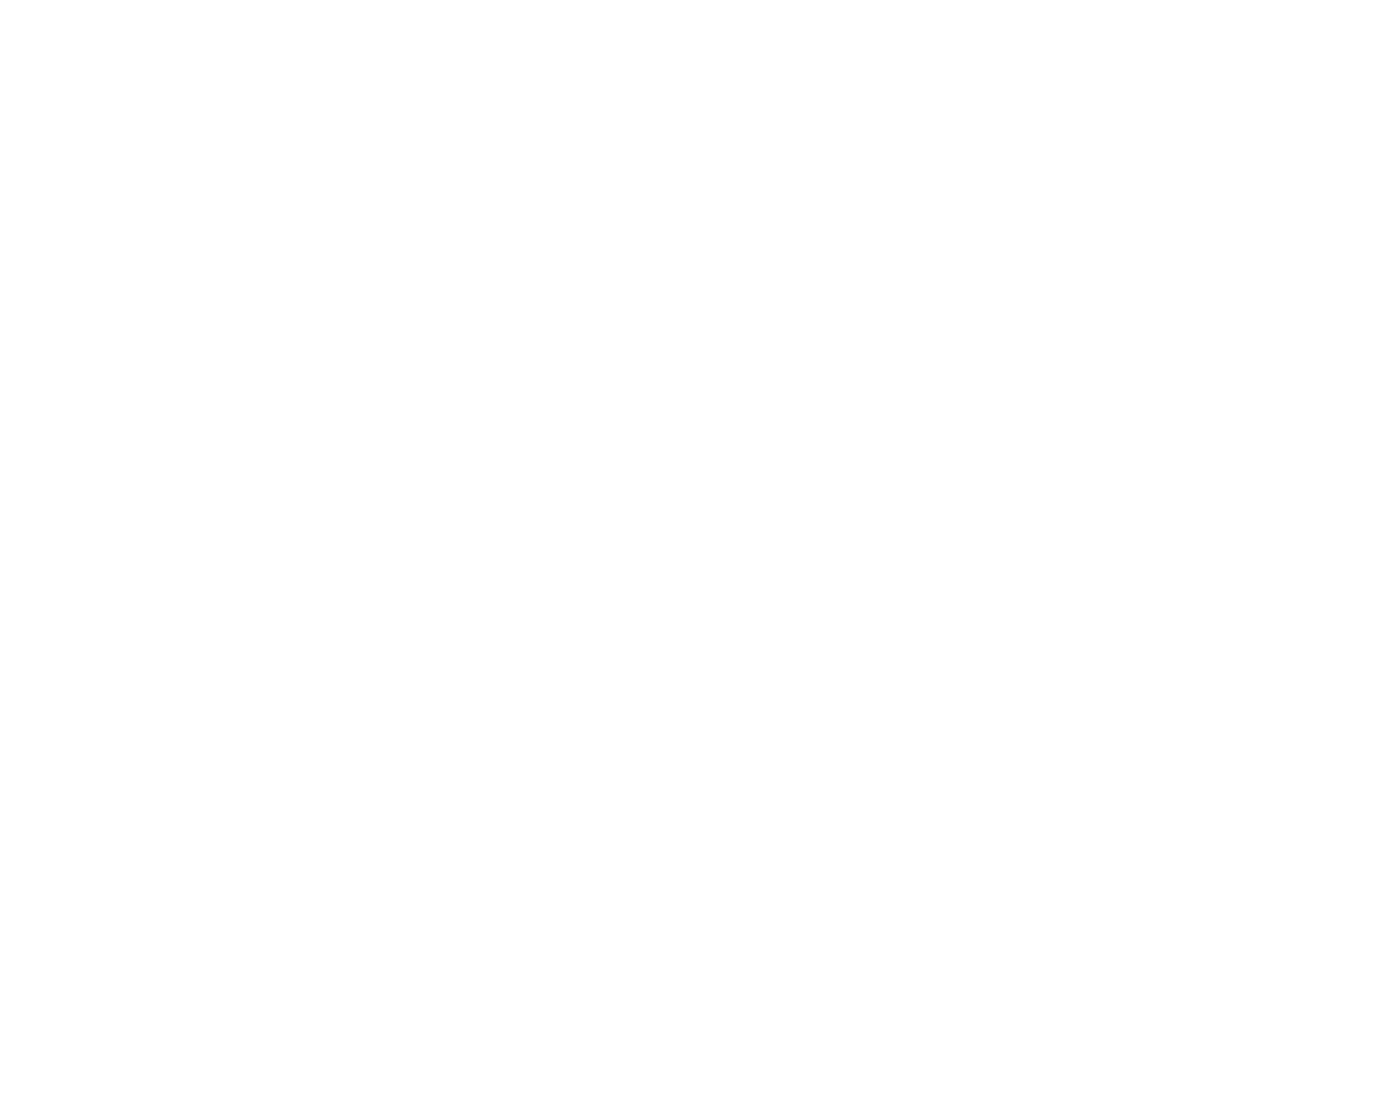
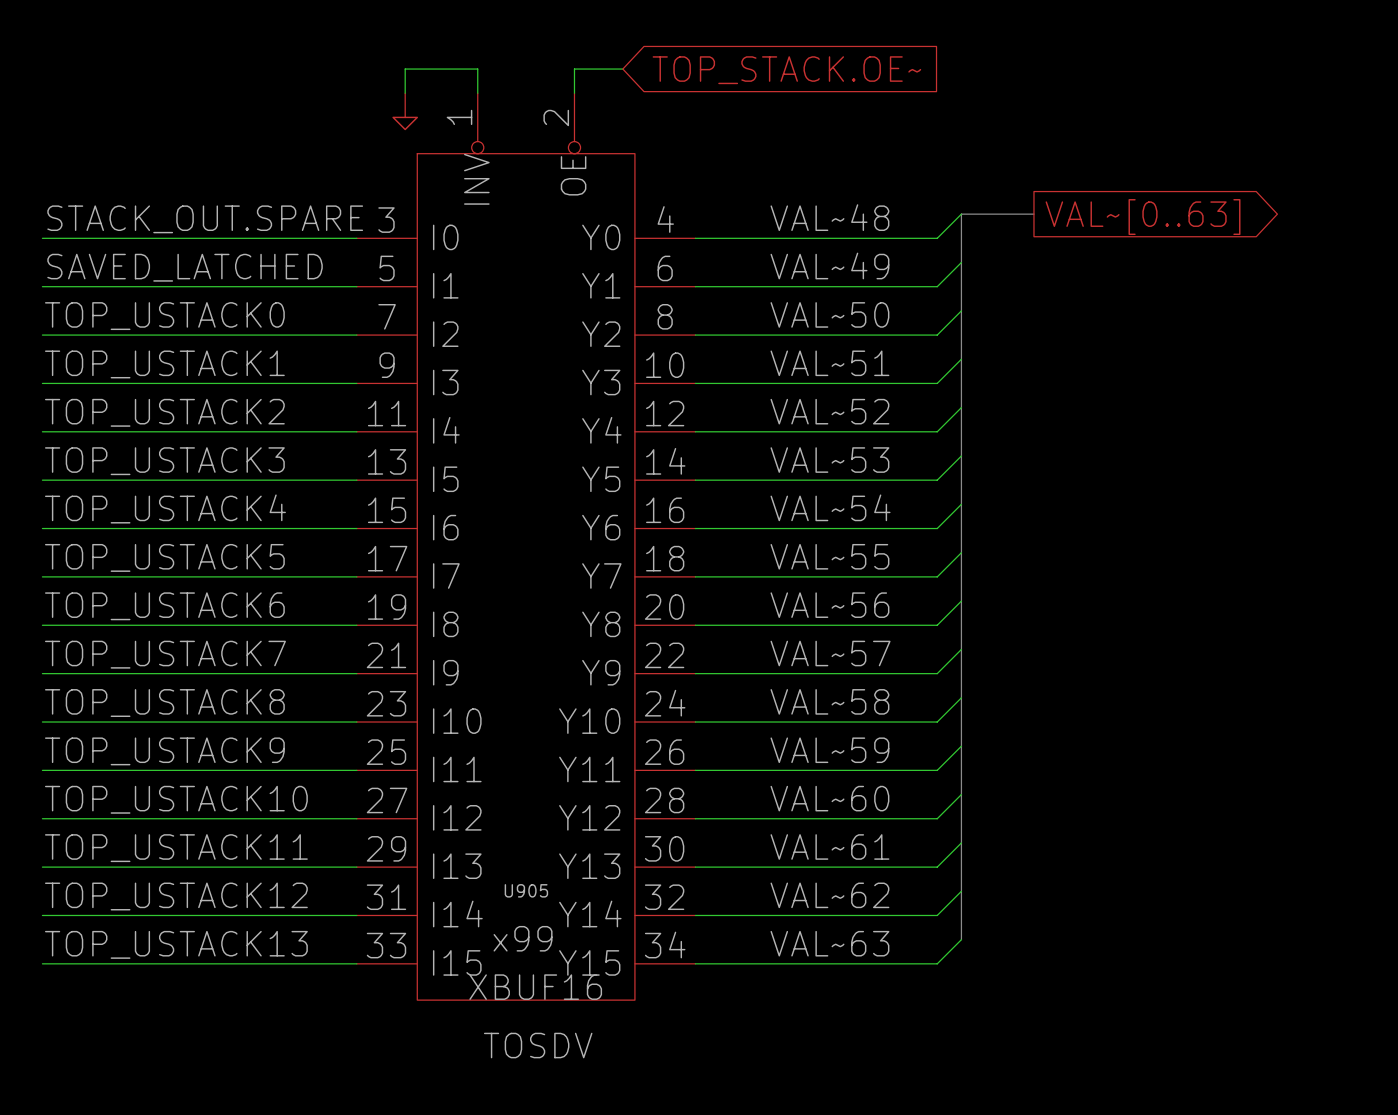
wire: none -> (622, 69) (574, 69) (574, 93)
global label: none -> TOP_STACK.OE~ (786, 70)
wire: none -> (405, 93) (405, 69) (477, 69) (477, 93)
power symbol: none -> (405, 111)
wire: none -> (961, 214) (937, 238) (695, 238)
bus: none -> (1033, 214) (961, 214) (961, 939)
label: none -> VAL~48 (829, 217)
global label: none -> VAL~[0..63] (1143, 217)
label: none -> STACK_OUT.SPARE (205, 219)
wire: none -> (42, 238) (356, 238)
wire: none -> (961, 262) (937, 286) (695, 286)
label: none -> VAL~49 (829, 265)
label: none -> SAVED_LATCHED (185, 267)
wire: none -> (42, 286) (356, 286)
wire: none -> (961, 310) (937, 335) (695, 335)
label: none -> VAL~50 (829, 314)
label: none -> TOP_USTACK0 (164, 316)
wire: none -> (42, 335) (356, 335)
wire: none -> (961, 359) (937, 383) (695, 383)
label: none -> VAL~51 (829, 363)
label: none -> TOP_USTACK1 (164, 364)
wire: none -> (42, 383) (356, 383)
wire: none -> (961, 407) (937, 431) (695, 431)
label: none -> VAL~52 (829, 411)
label: none -> TOP_USTACK2 (164, 412)
wire: none -> (42, 431) (356, 431)
wire: none -> (961, 455) (937, 480) (695, 480)
label: none -> VAL~53 (829, 460)
label: none -> TOP_USTACK3 (164, 461)
wire: none -> (42, 480) (356, 480)
wire: none -> (961, 504) (937, 528) (695, 528)
label: none -> VAL~54 (830, 507)
label: none -> TOP_USTACK4 (165, 508)
wire: none -> (42, 528) (356, 528)
U905: none -> XBUF16 (526, 546)
wire: none -> (961, 552) (937, 576) (695, 576)
label: none -> VAL~55 (829, 556)
label: none -> TOP_USTACK5 (164, 557)
wire: none -> (42, 576) (356, 576)
wire: none -> (961, 601) (937, 625) (695, 625)
label: none -> VAL~56 (829, 605)
label: none -> TOP_USTACK6 (164, 606)
wire: none -> (42, 625) (356, 625)
wire: none -> (961, 649) (937, 673) (695, 673)
label: none -> VAL~57 (830, 653)
label: none -> TOP_USTACK7 (165, 654)
wire: none -> (42, 673) (356, 673)
wire: none -> (961, 697) (937, 722) (695, 722)
label: none -> VAL~58 (829, 701)
label: none -> TOP_USTACK8 (164, 703)
wire: none -> (42, 722) (356, 722)
wire: none -> (961, 746) (937, 770) (695, 770)
label: none -> VAL~59 (829, 750)
label: none -> TOP_USTACK9 (164, 751)
wire: none -> (42, 770) (356, 770)
wire: none -> (961, 794) (937, 818) (695, 818)
label: none -> VAL~60 (829, 798)
label: none -> TOP_USTACK10 (176, 799)
wire: none -> (42, 818) (356, 818)
wire: none -> (961, 842) (937, 867) (695, 867)
label: none -> VAL~61 (829, 846)
label: none -> TOP_USTACK11 (176, 848)
wire: none -> (42, 867) (356, 867)
wire: none -> (961, 891) (937, 915) (695, 915)
label: none -> VAL~62 (829, 895)
label: none -> TOP_USTACK12 (176, 896)
wire: none -> (42, 915) (356, 915)
wire: none -> (961, 939) (937, 963) (695, 963)
label: none -> VAL~63 (829, 943)
label: none -> TOP_USTACK13 (176, 944)
wire: none -> (42, 963) (356, 963)

